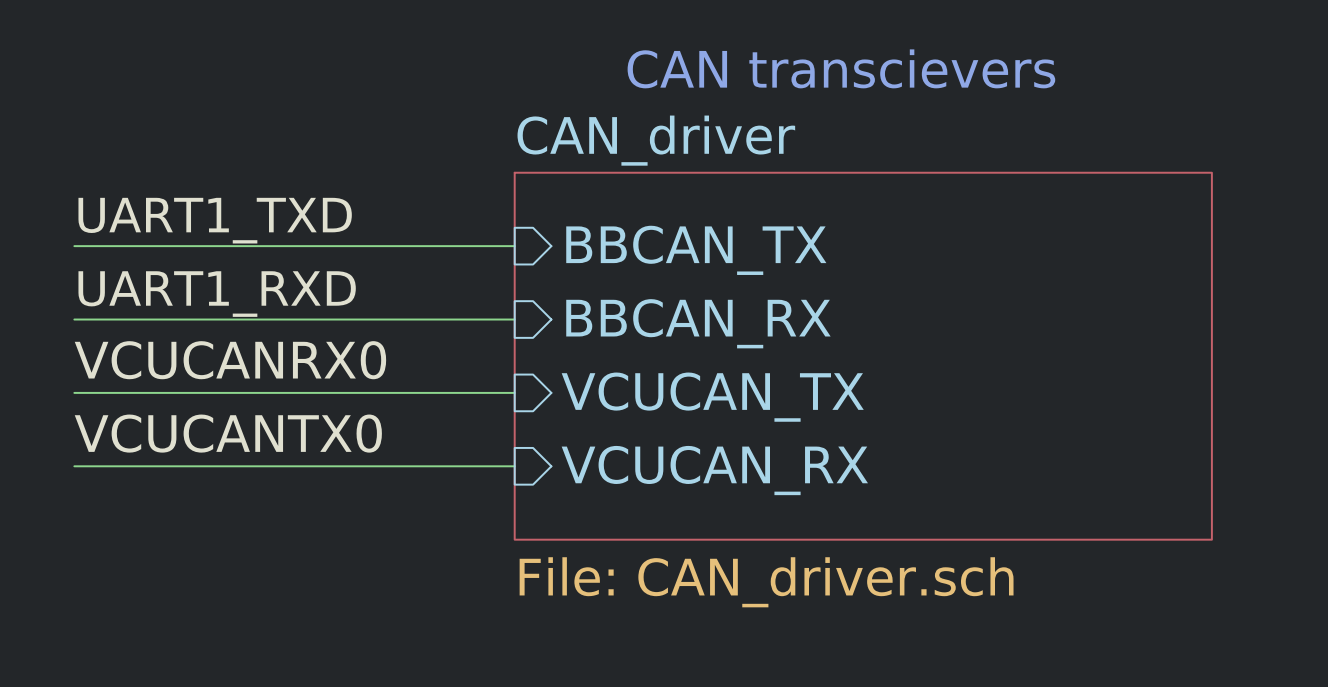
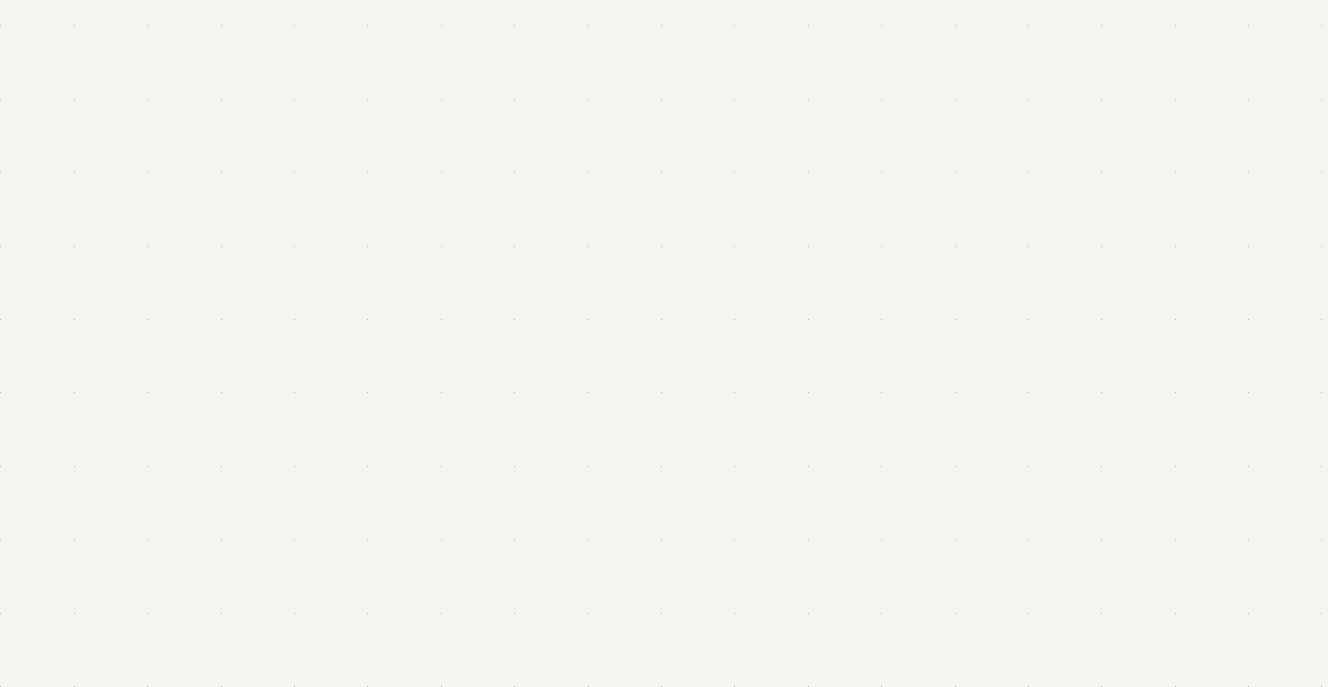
text: CAN transcievers (841, 68) -> none
label: UART1_TXD (215, 220) -> none
wire: (74, 246) (514, 246) -> none
sheet pin: BBCAN_TX (696, 250) -> none
label: UART1_RXD (217, 294) -> none
wire: (74, 319) (514, 319) -> none
sheet pin: BBCAN_RX (698, 323) -> none
sheet CAN_driver: File: CAN_driver.sch (863, 356) -> none
label: VCUCANRX0 (230, 360) -> none
wire: (74, 392) (514, 392) -> none
sheet pin: VCUCAN_TX (712, 397) -> none
label: VCUCANTX0 (228, 433) -> none
wire: (74, 466) (514, 466) -> none
sheet pin: VCUCAN_RX (714, 470) -> none

